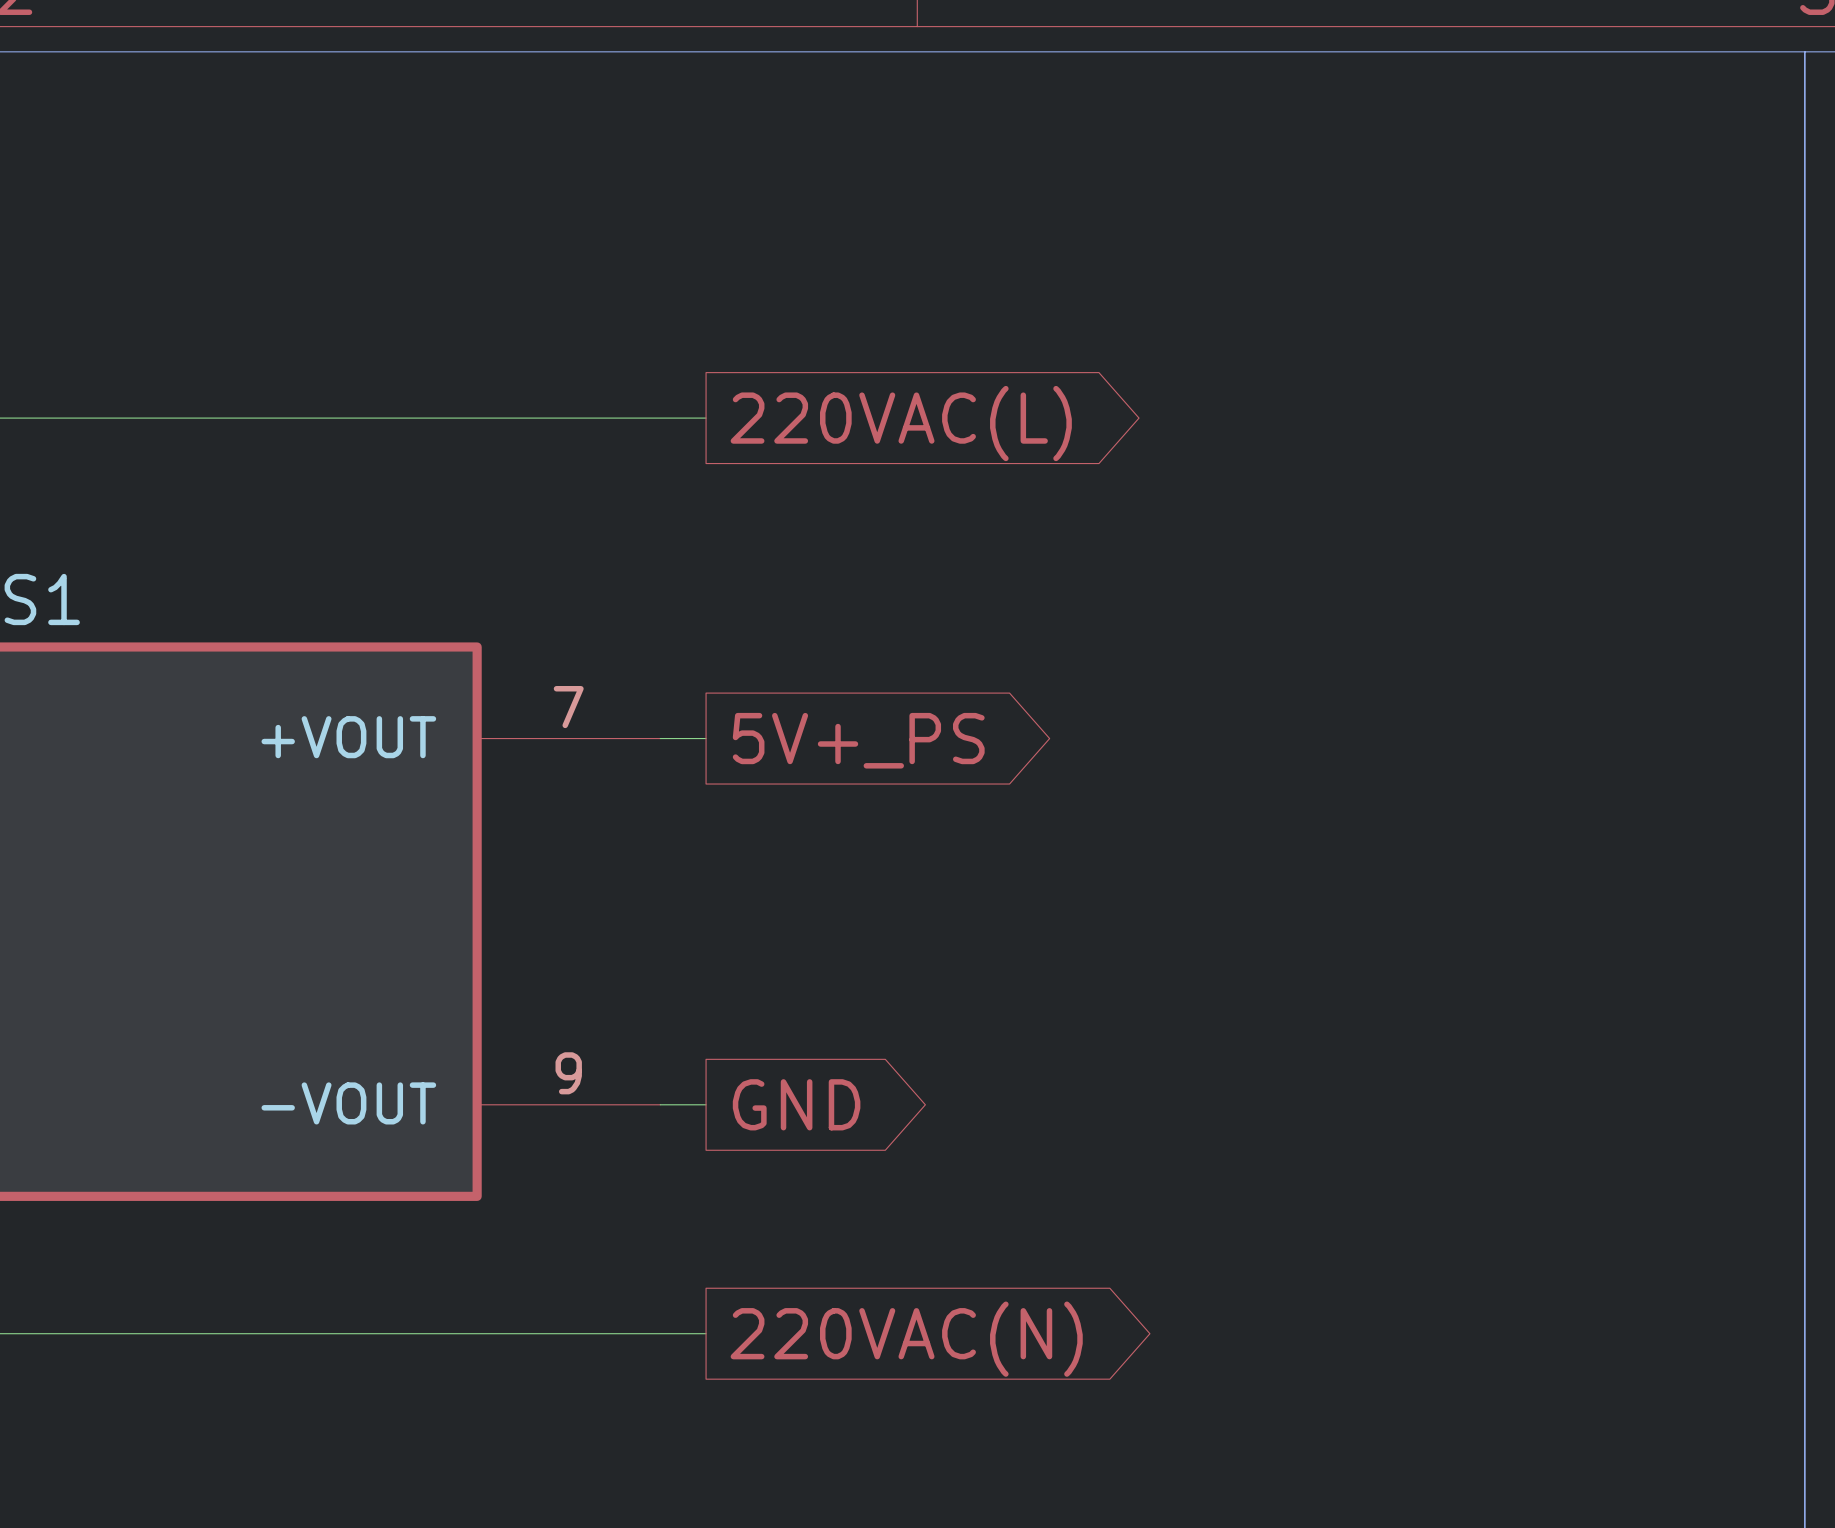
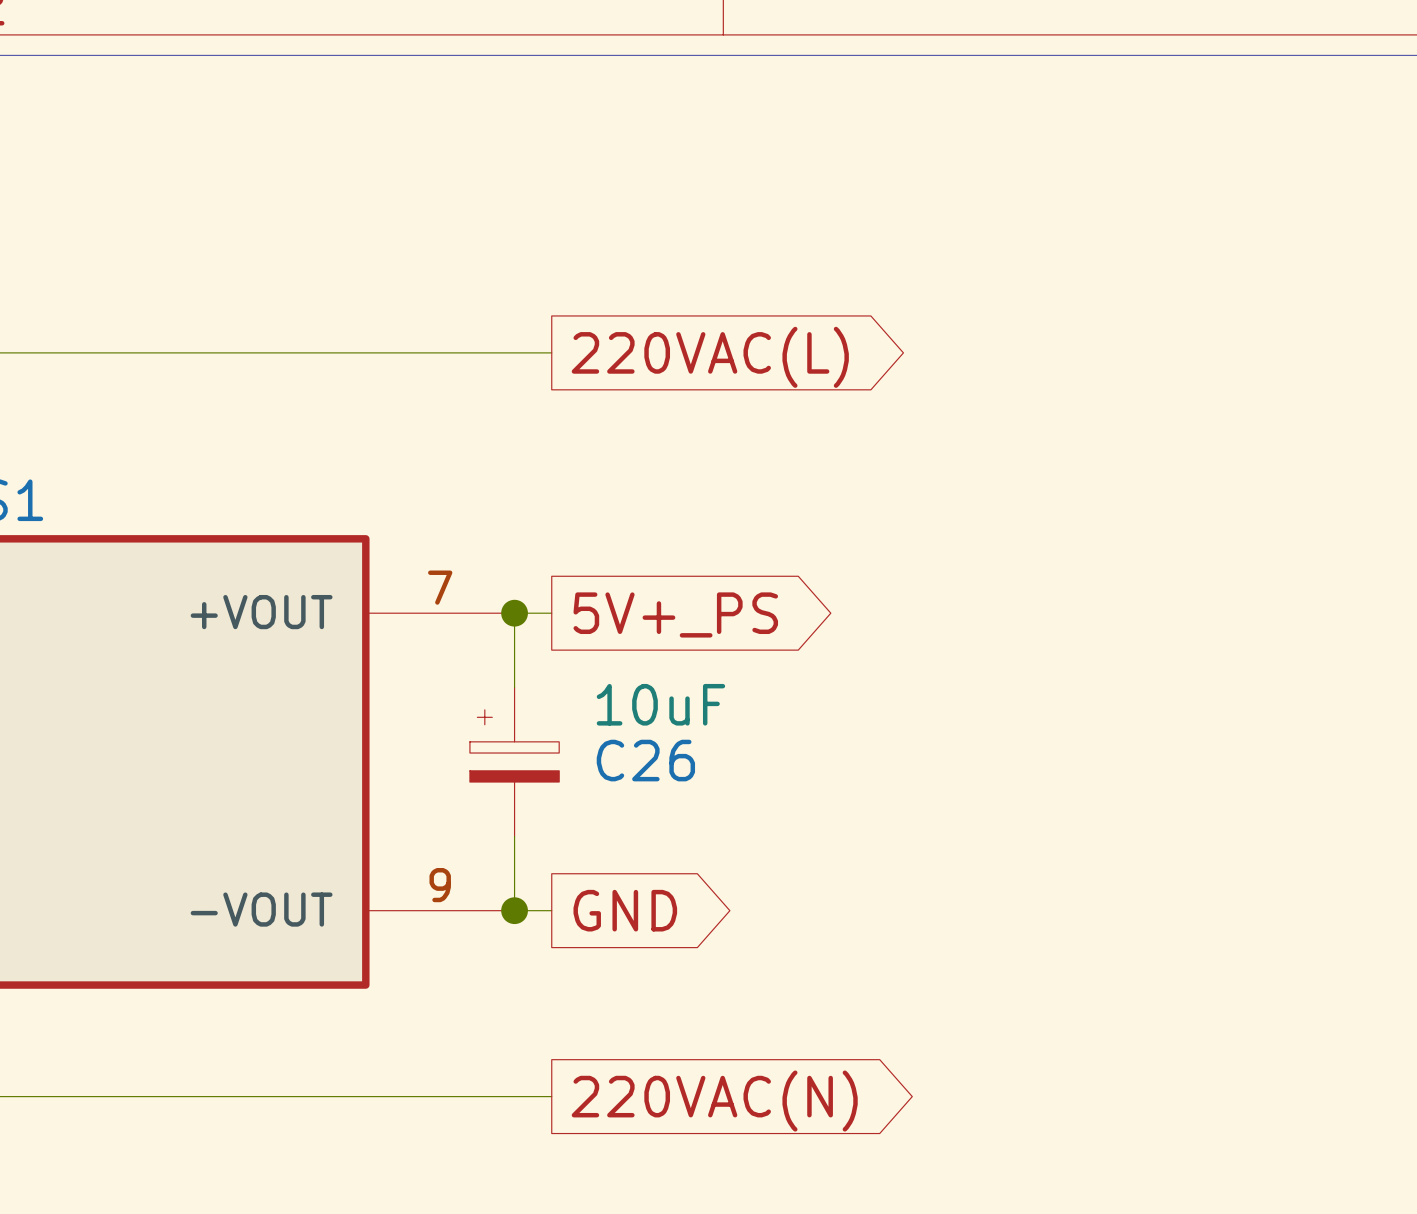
wire: none -> (514, 613) (514, 687)
junction: none -> (514, 613)
C26: none -> 10uF (514, 761)
wire: none -> (514, 836) (514, 910)
junction: none -> (514, 910)

